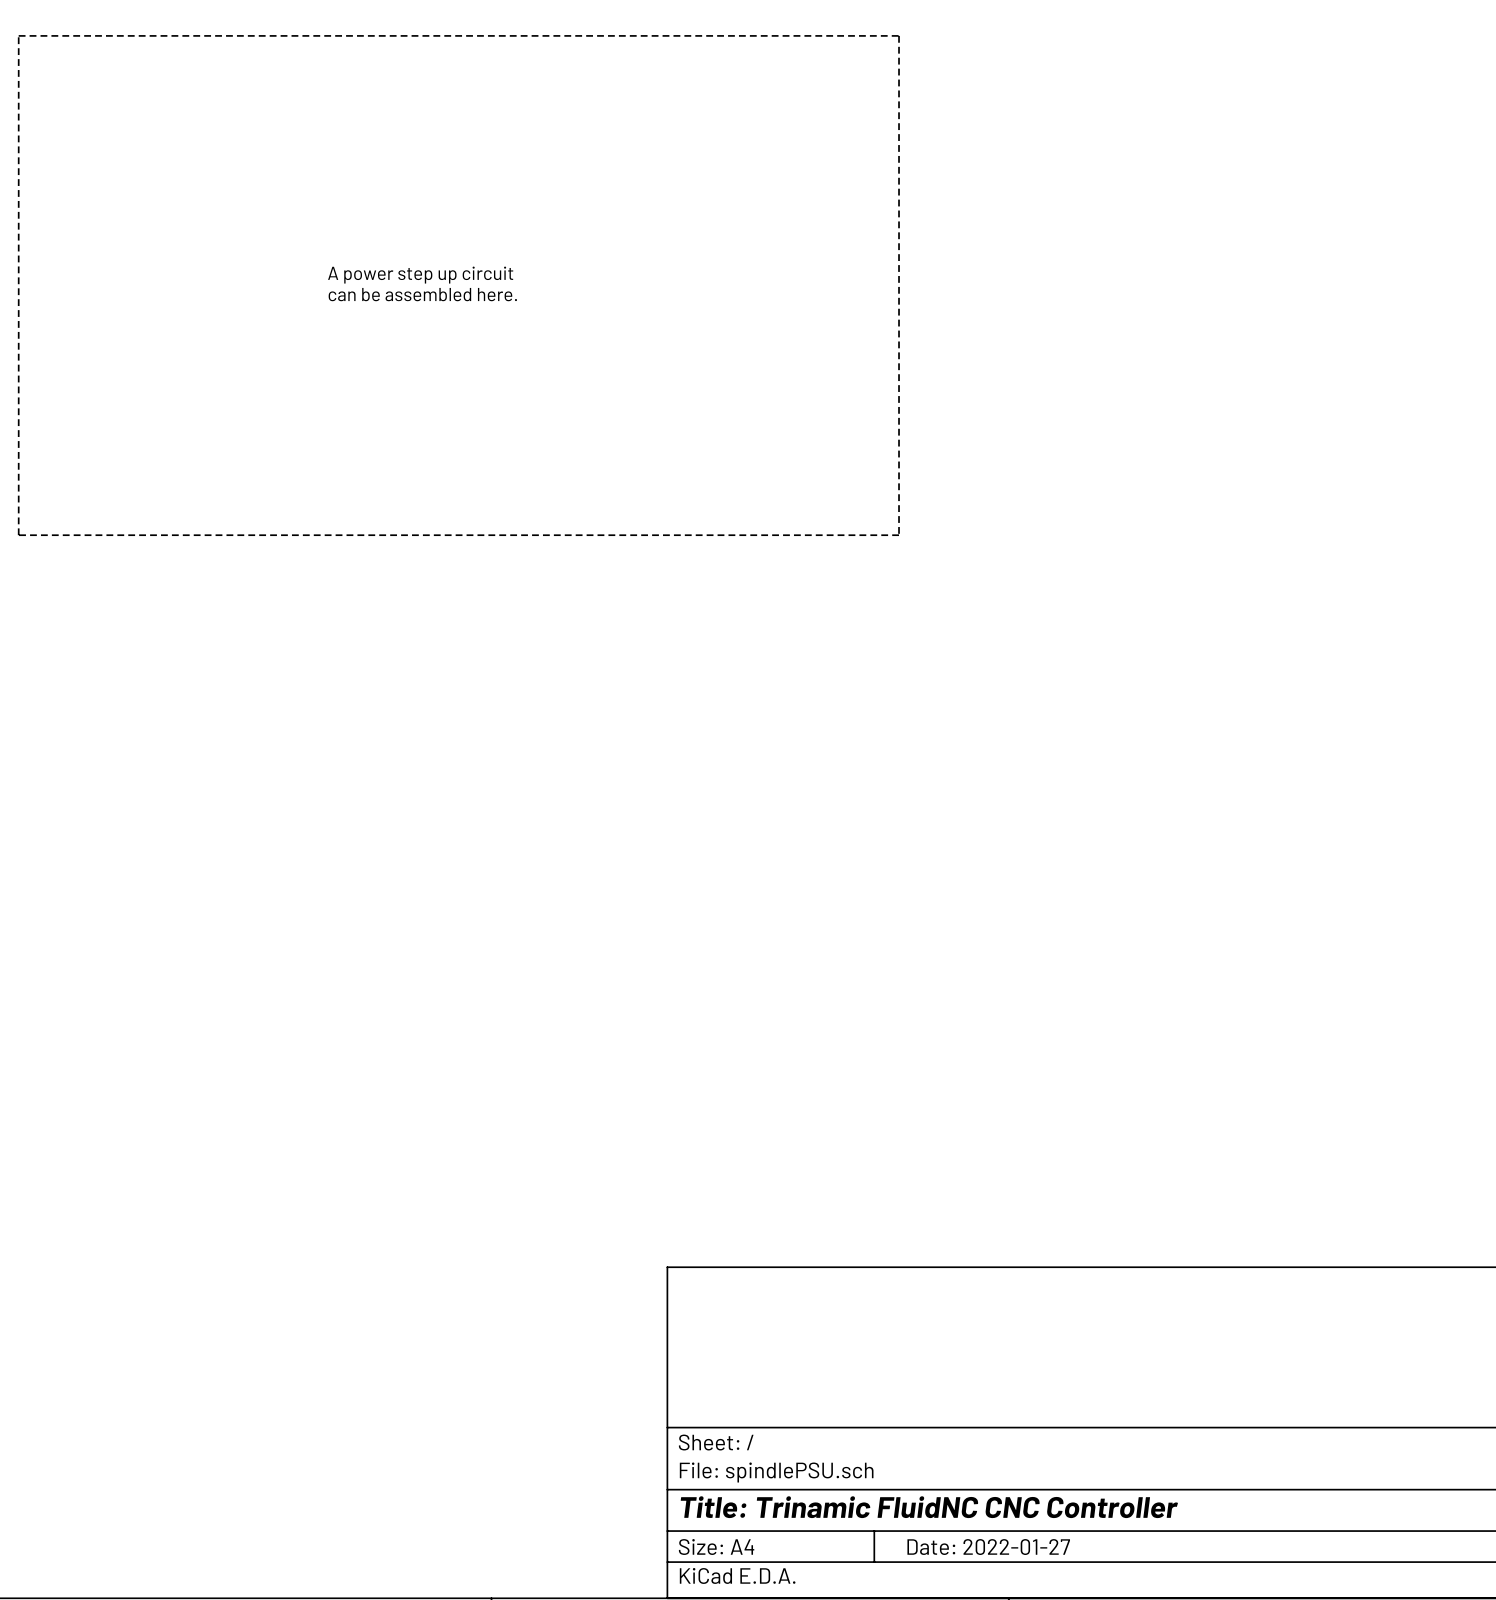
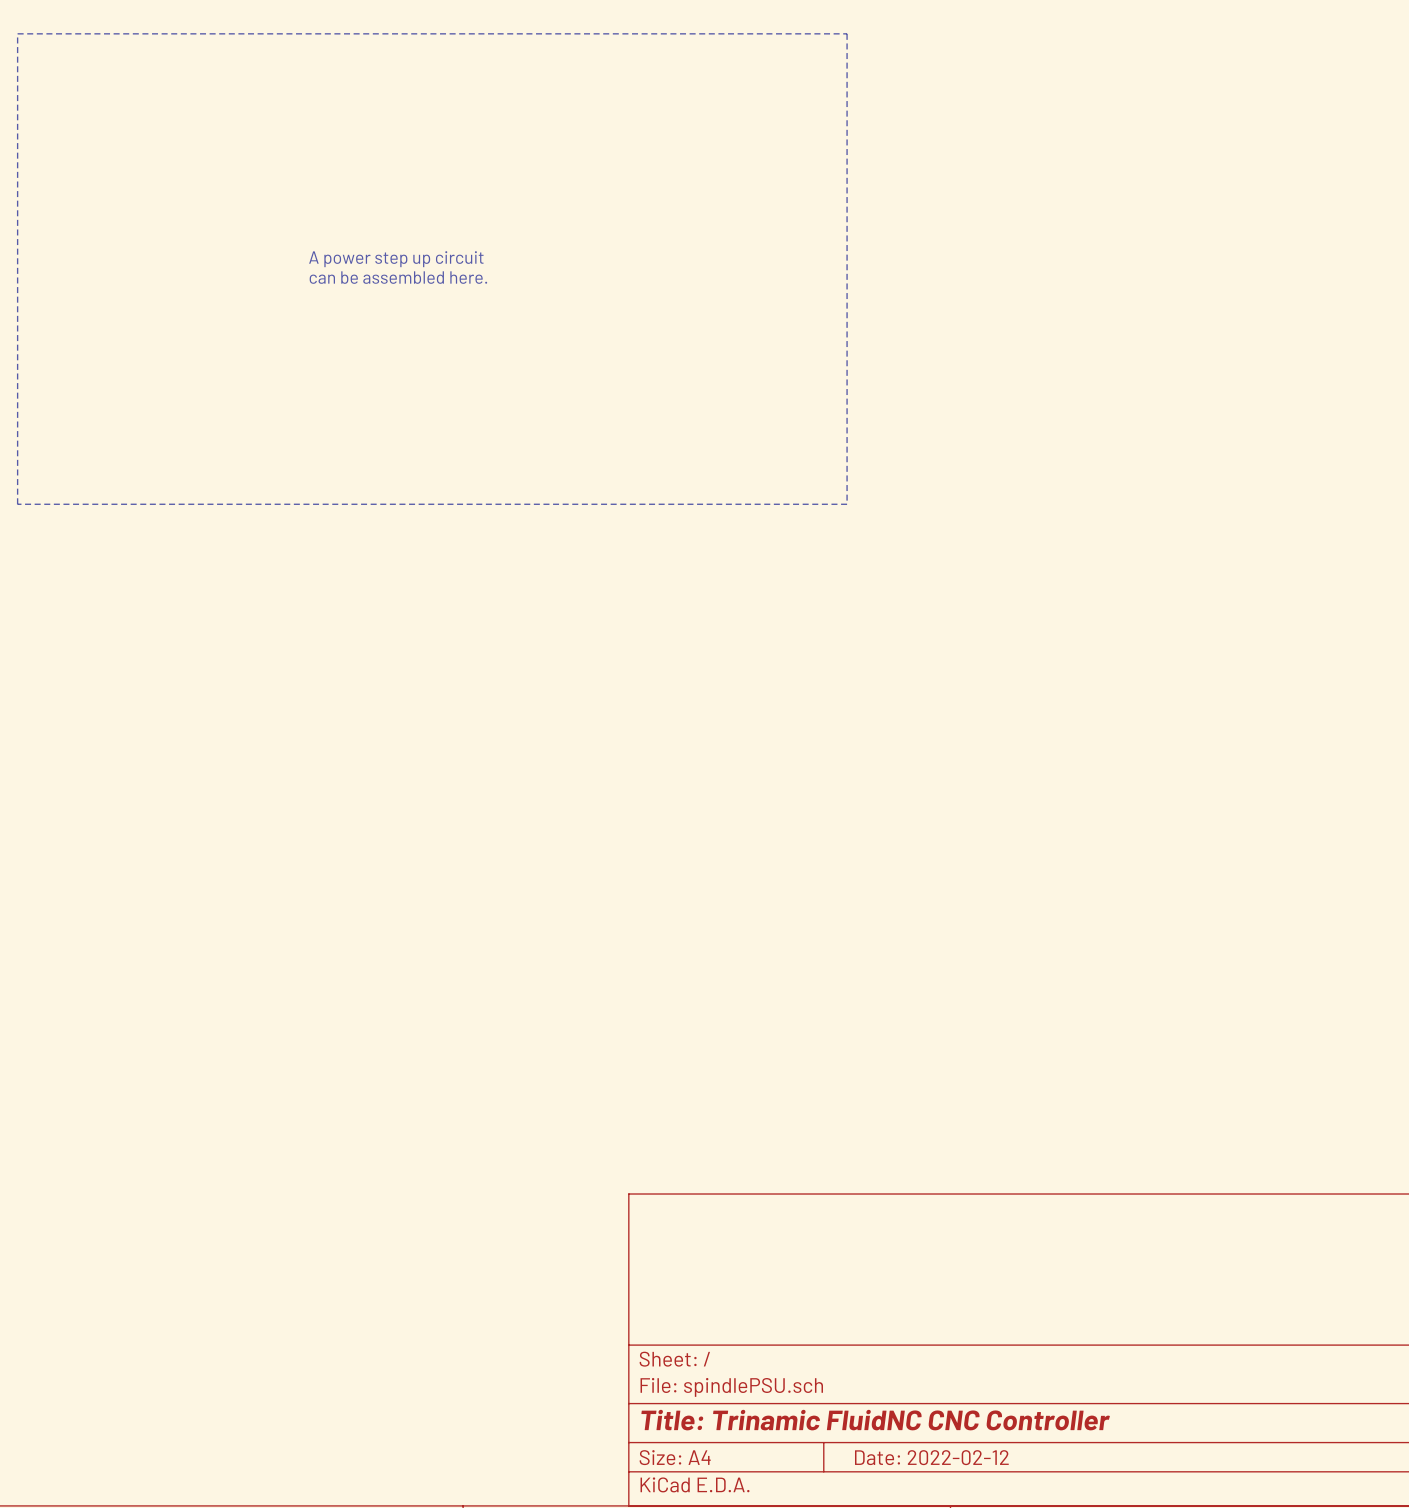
title block: Date: 2022-01-27 (988, 1547) -> Date: 2022-02-12 (931, 1457)

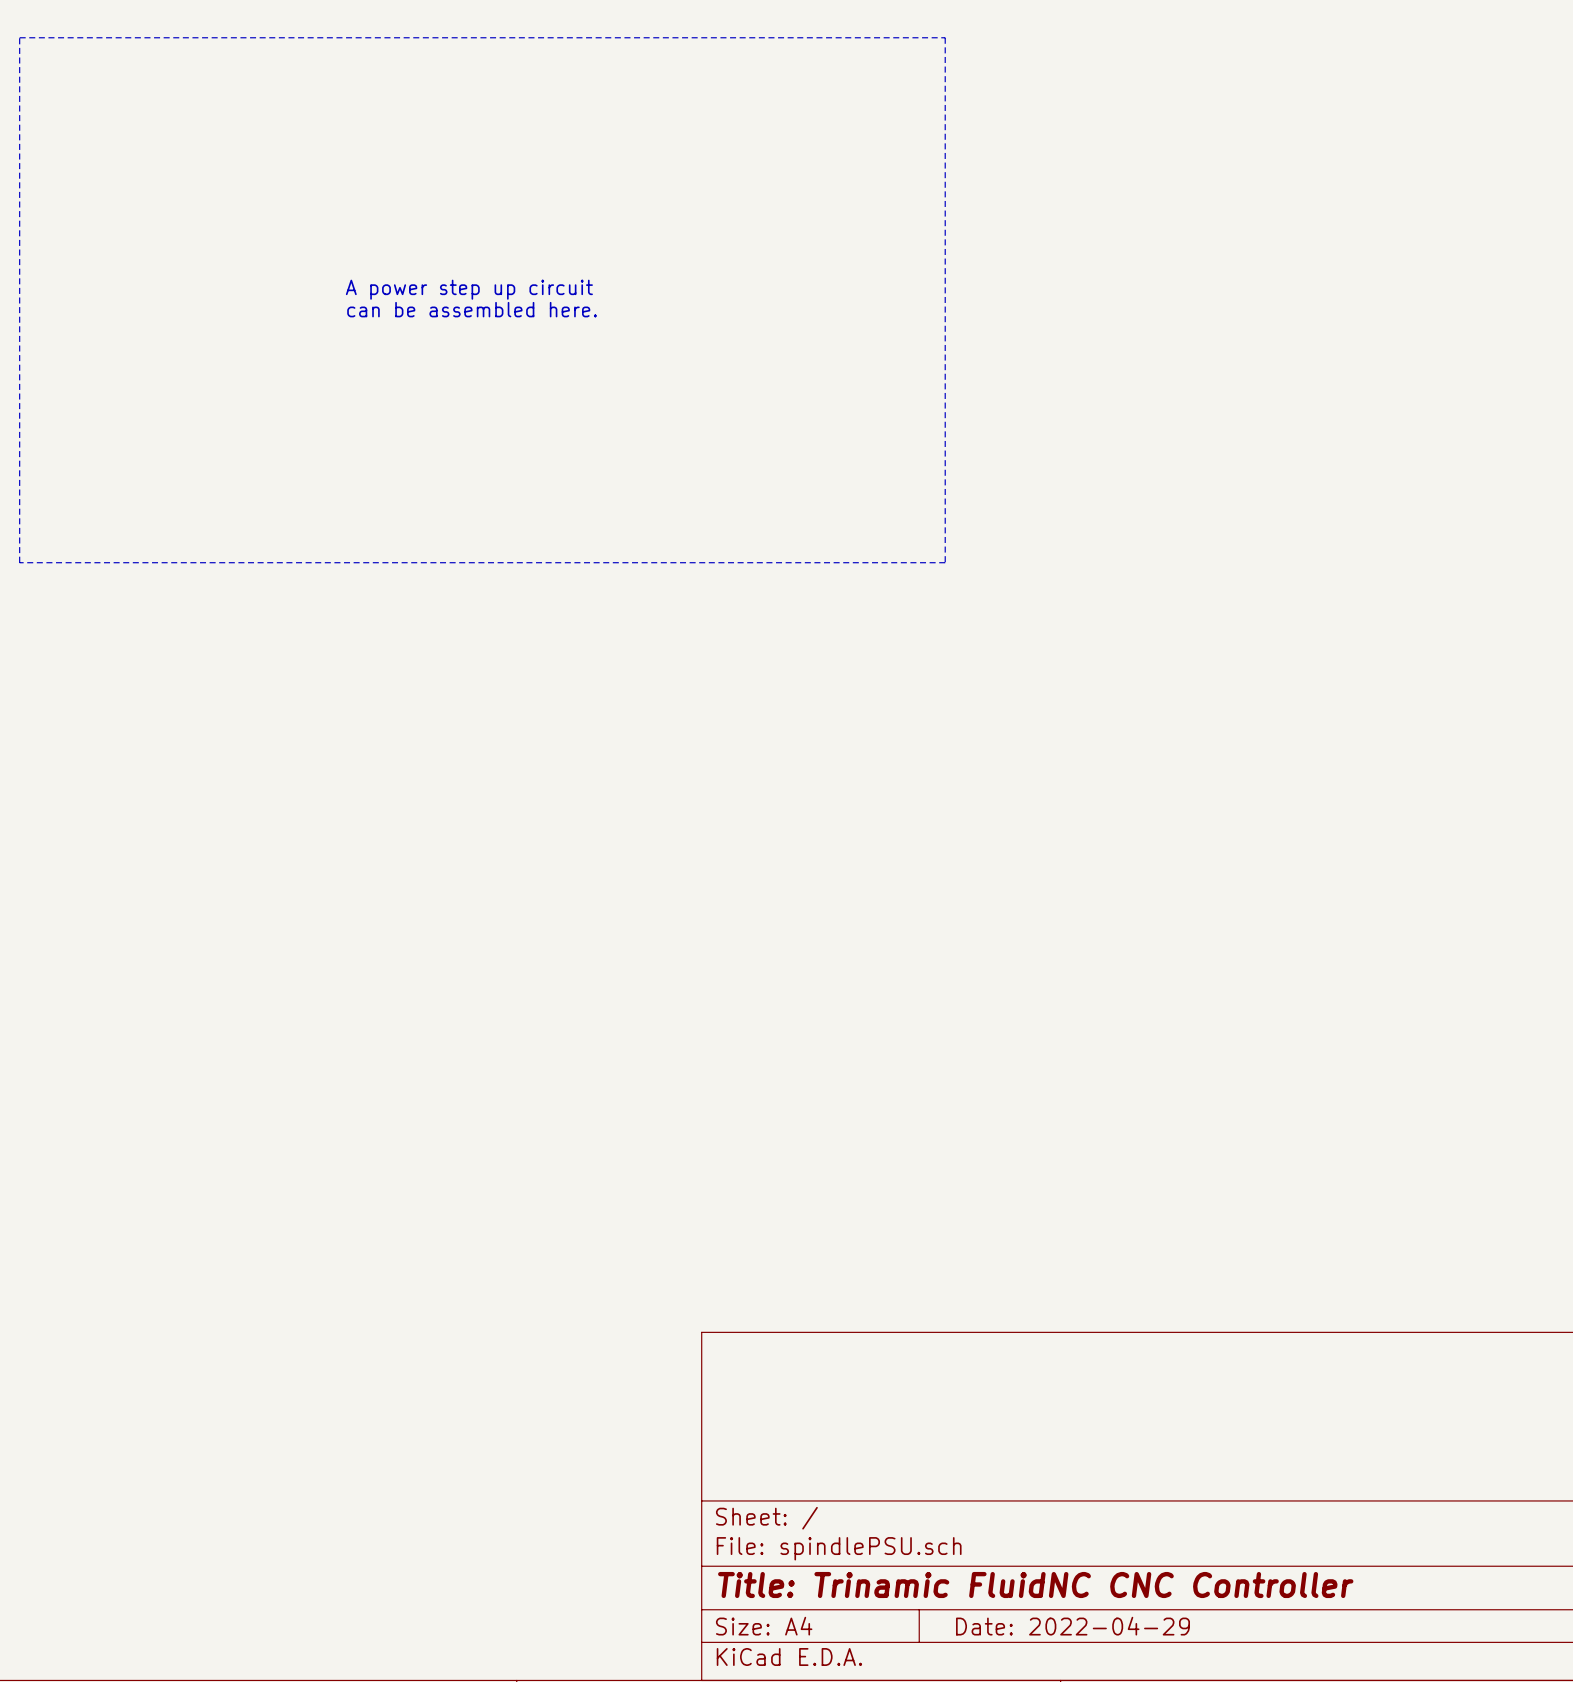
title block: Date: 2022-02-12 (931, 1457) -> Date: 2022-04-29 (1073, 1626)

